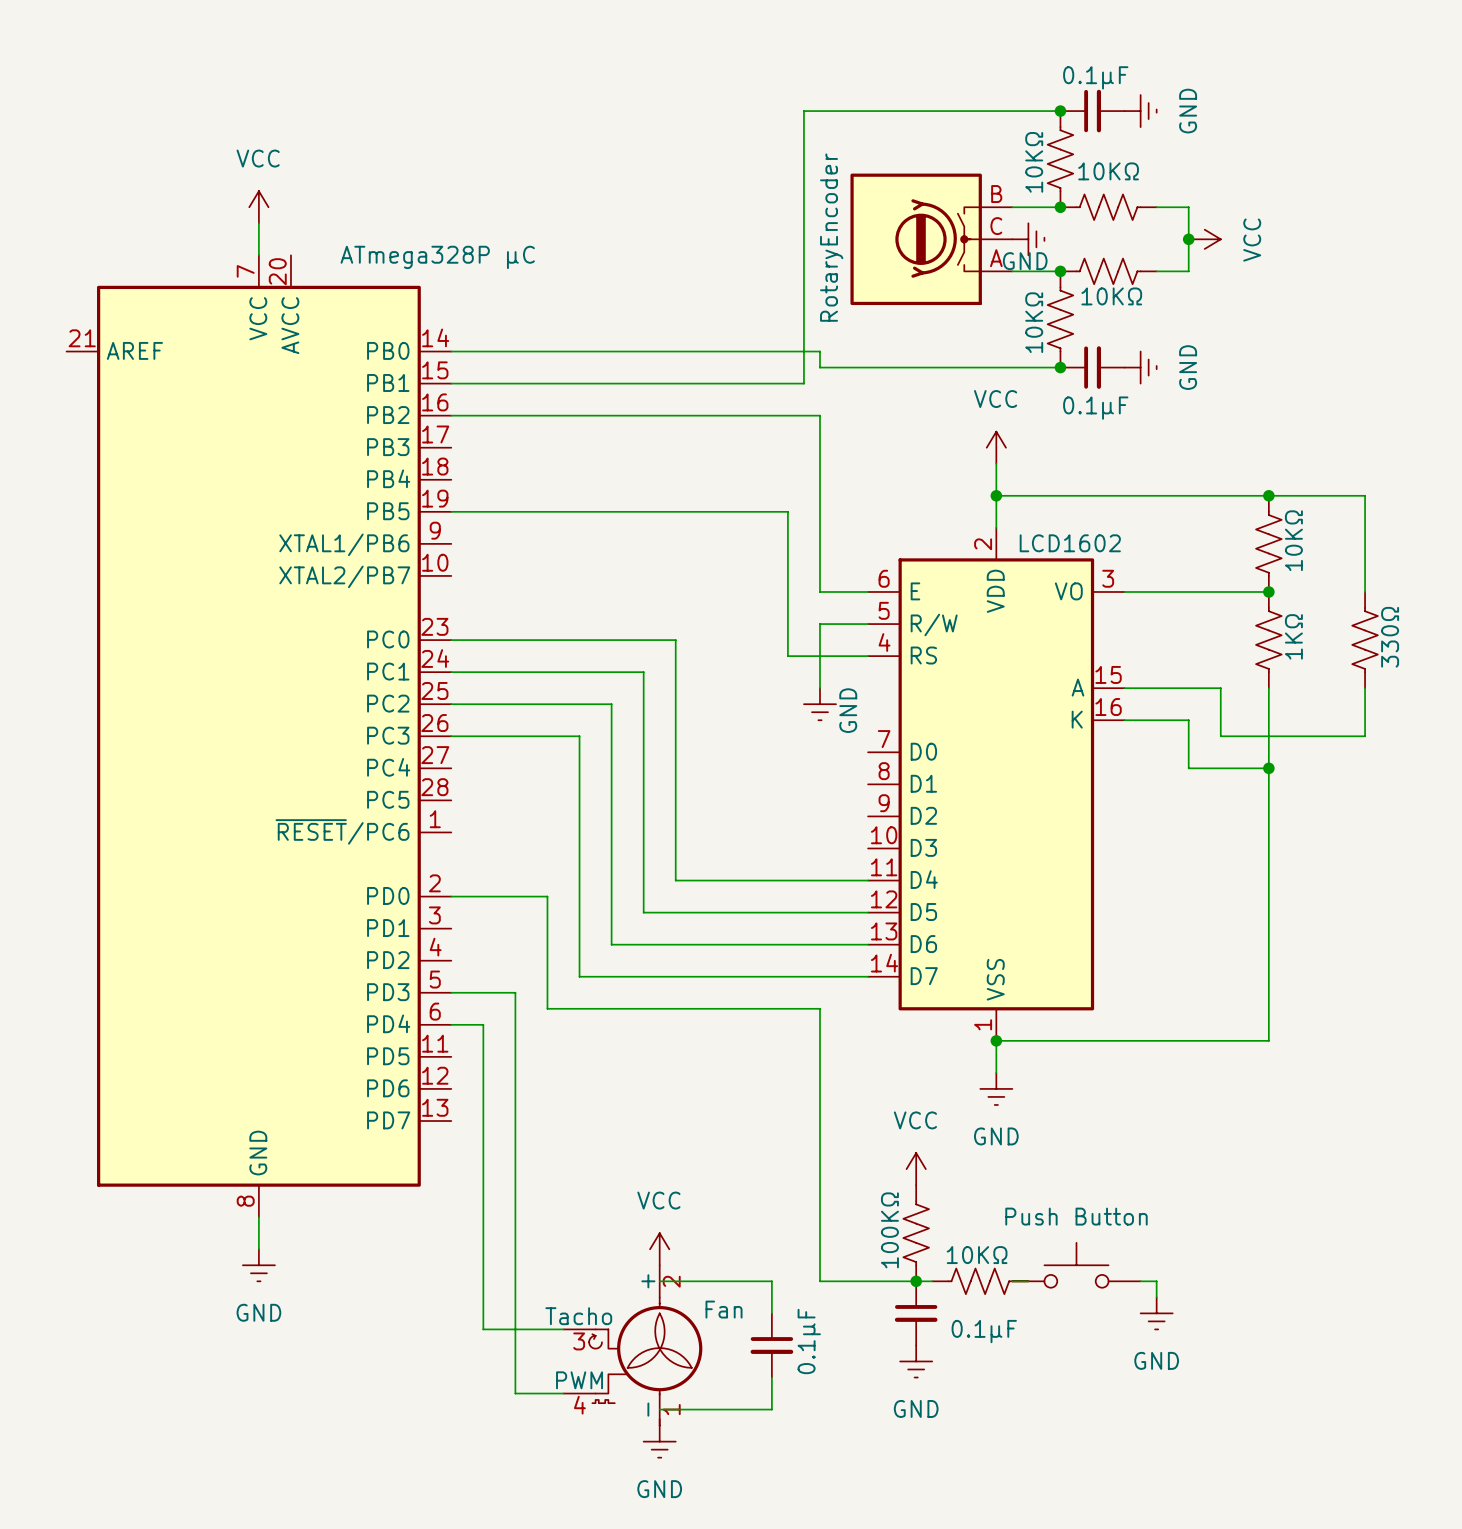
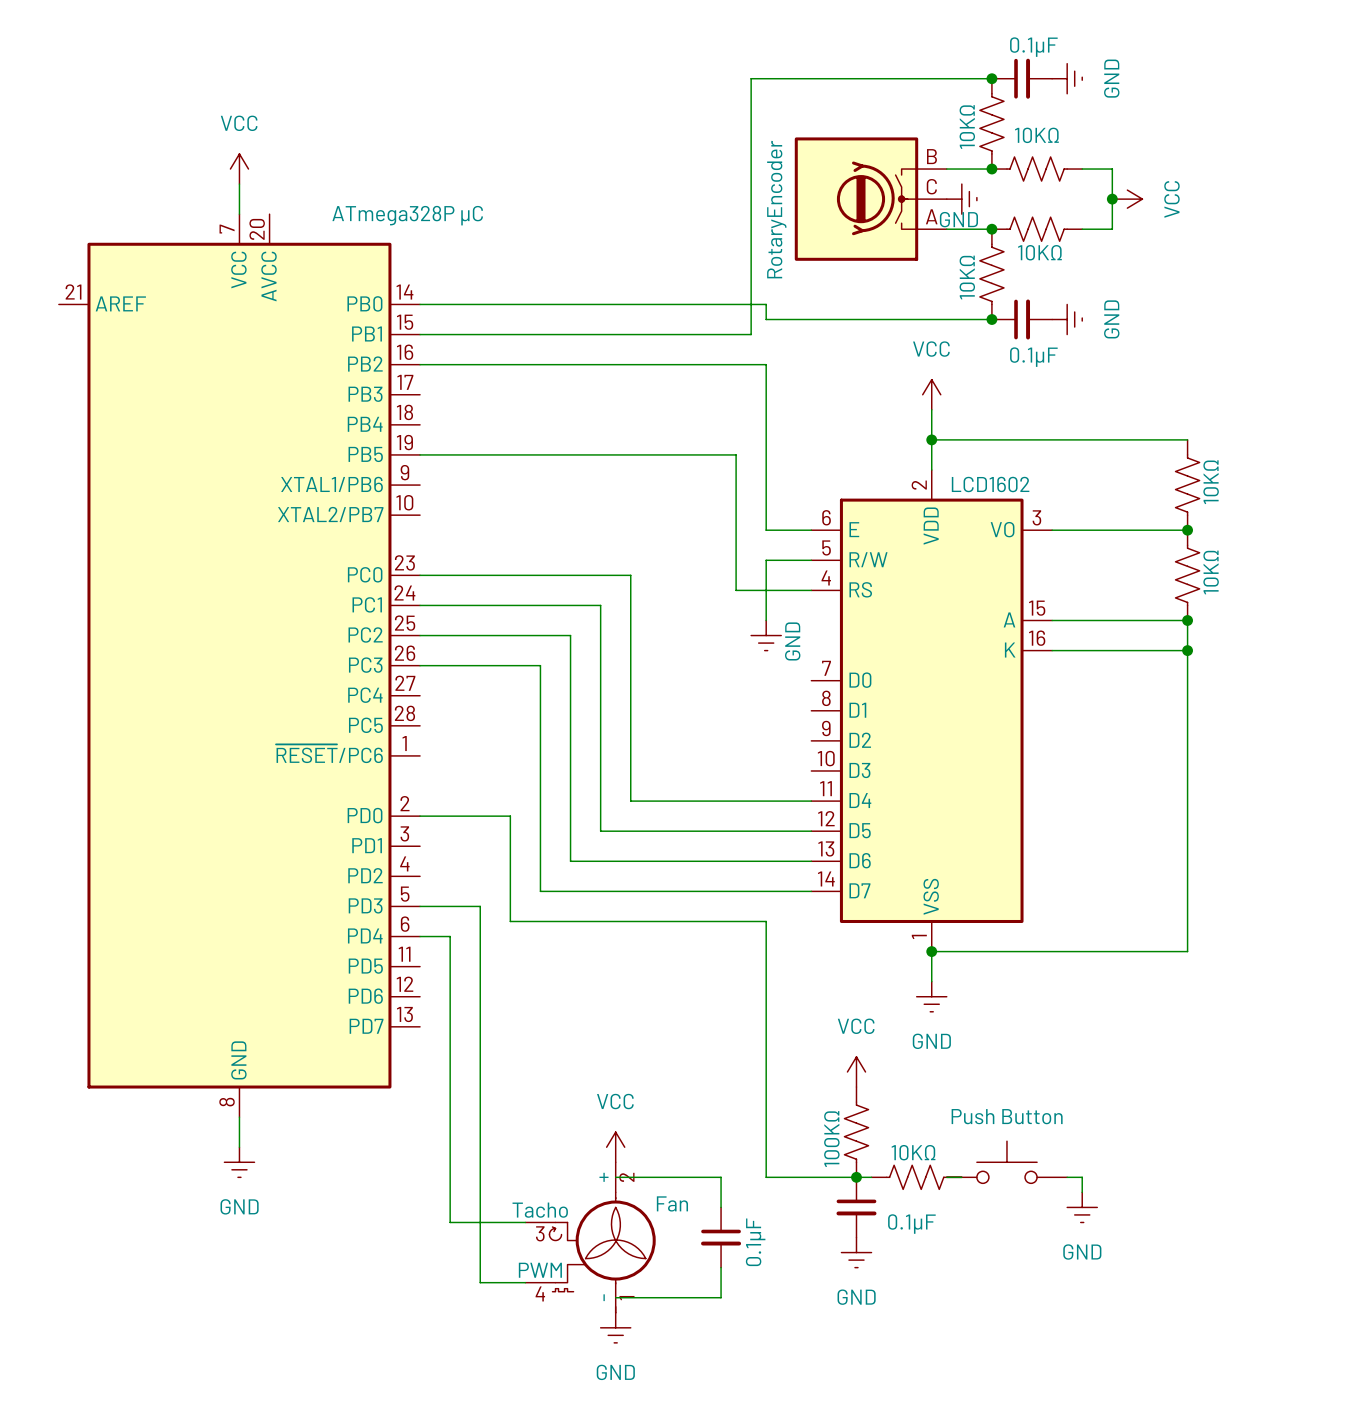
wire: (1268, 495) (1365, 495) (1365, 591) -> none
junction: (1268, 495) -> none
part value: 1KΩ (1293, 636) -> 10KΩ (1211, 572)
part: 330Ω (1365, 640) -> none
wire: (1220, 688) (1220, 736) (1365, 736) (1365, 688) -> (1142, 620) (1187, 620)
junction: none -> (1187, 620)
wire: (1188, 720) (1188, 768) (1268, 768) -> (1112, 650) (1187, 650)
junction: none -> (1187, 650)
junction: (1268, 768) -> none

